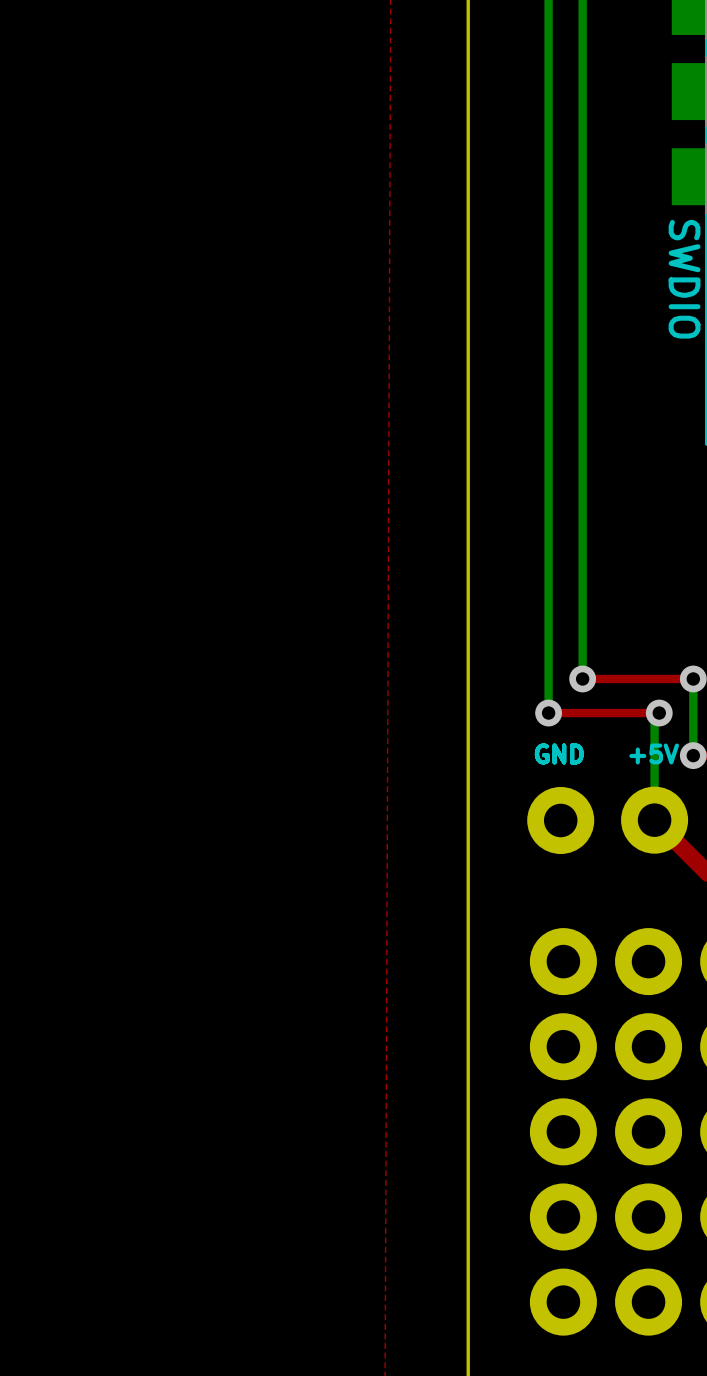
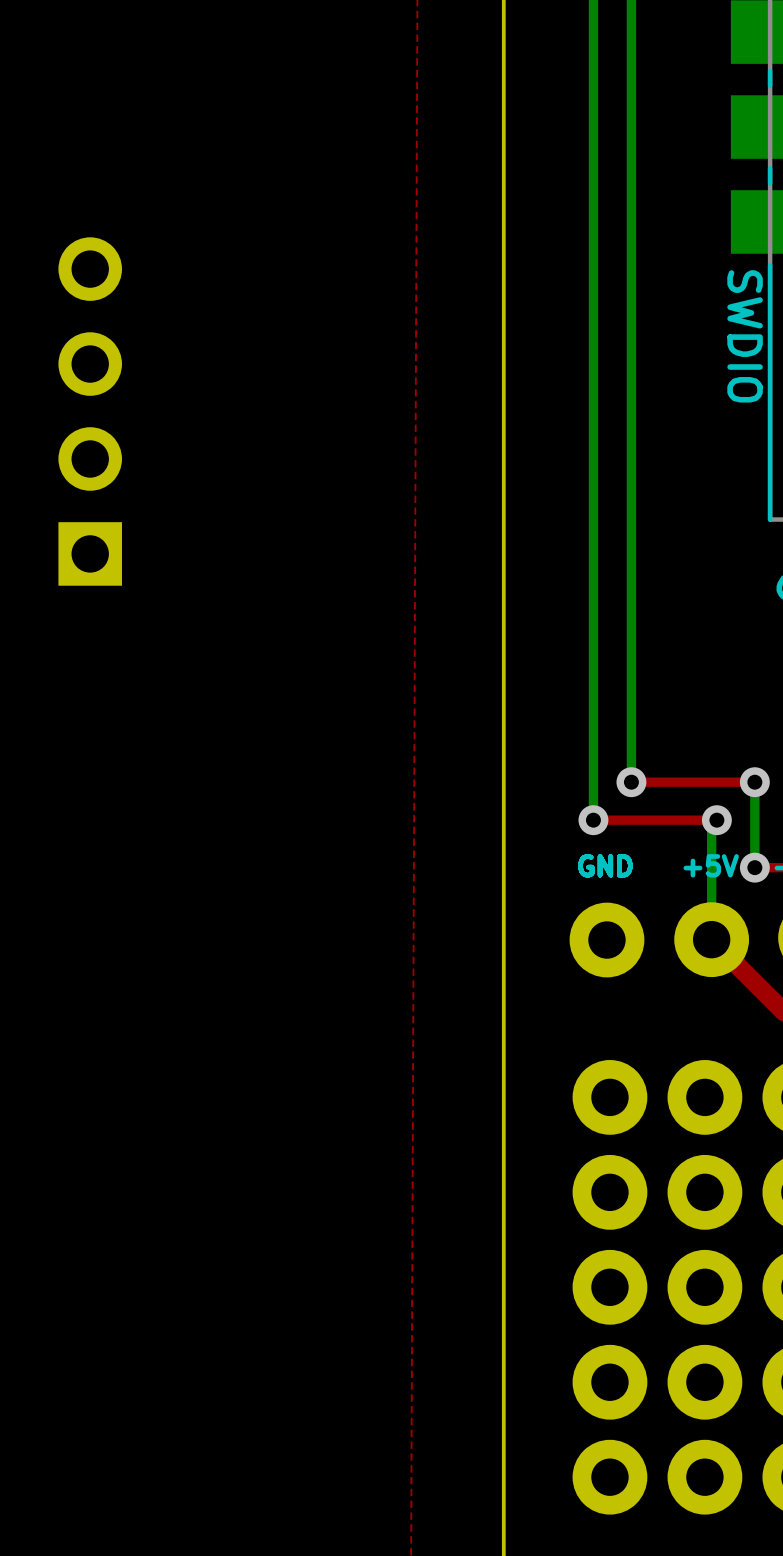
part: none -> (90, 411)

